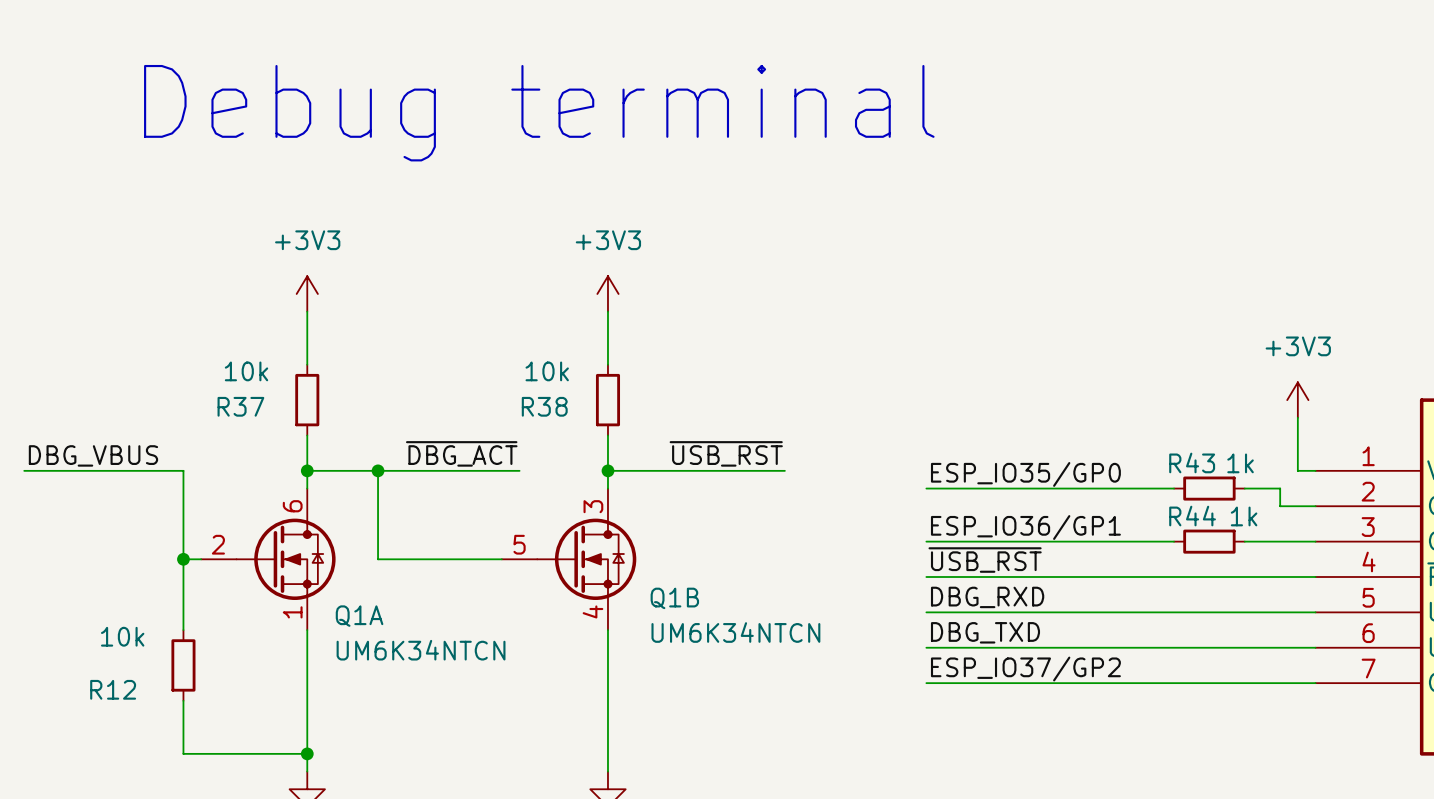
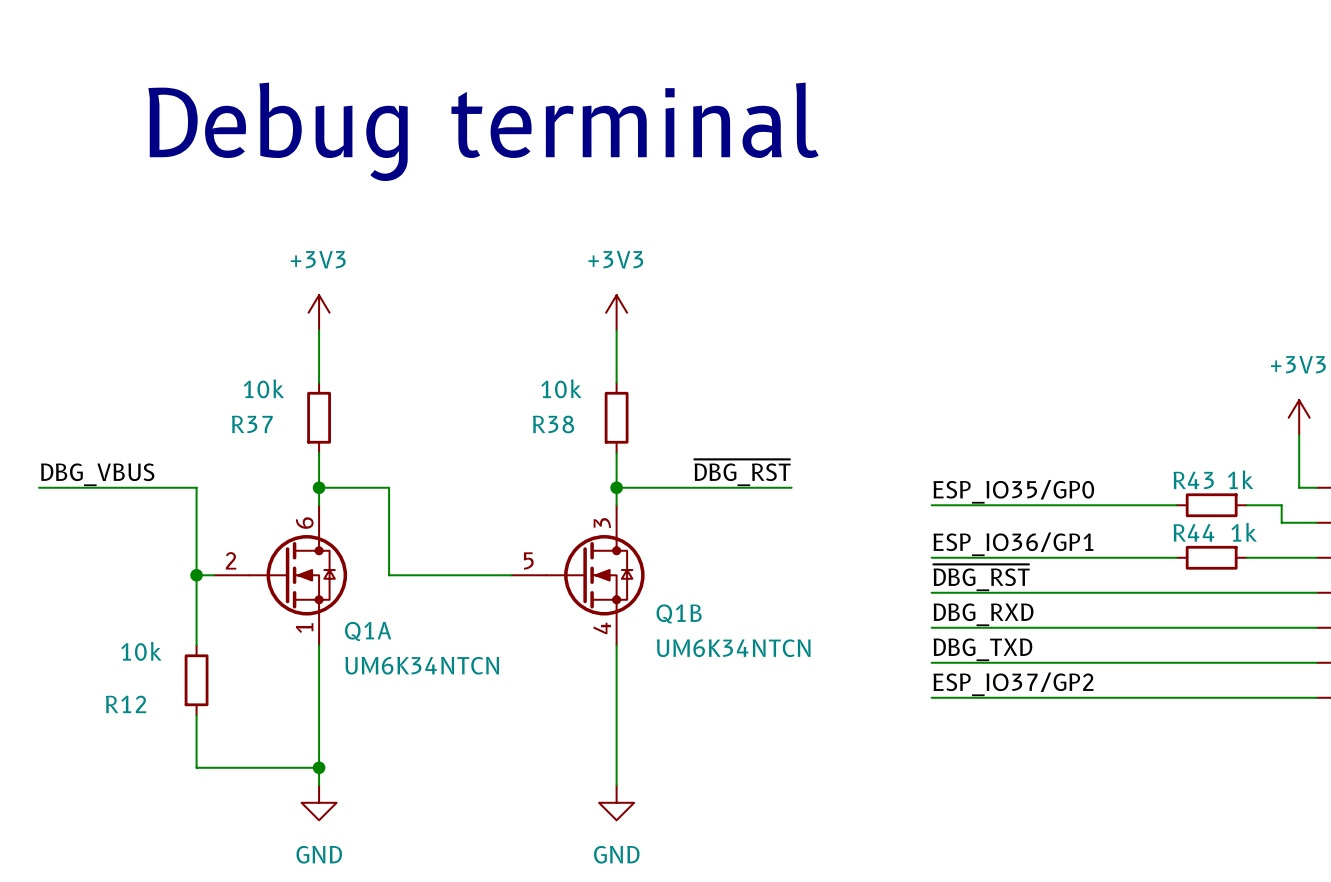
label: ~{DBG_ACT} (461, 453) -> none
label: ~{USB_RST} (726, 453) -> ~{DBG_RST} (742, 472)
wire: (378, 470) (519, 470) -> none
junction: (378, 470) -> none
label: ~{USB_RST} (985, 560) -> ~{DBG_RST} (981, 577)

